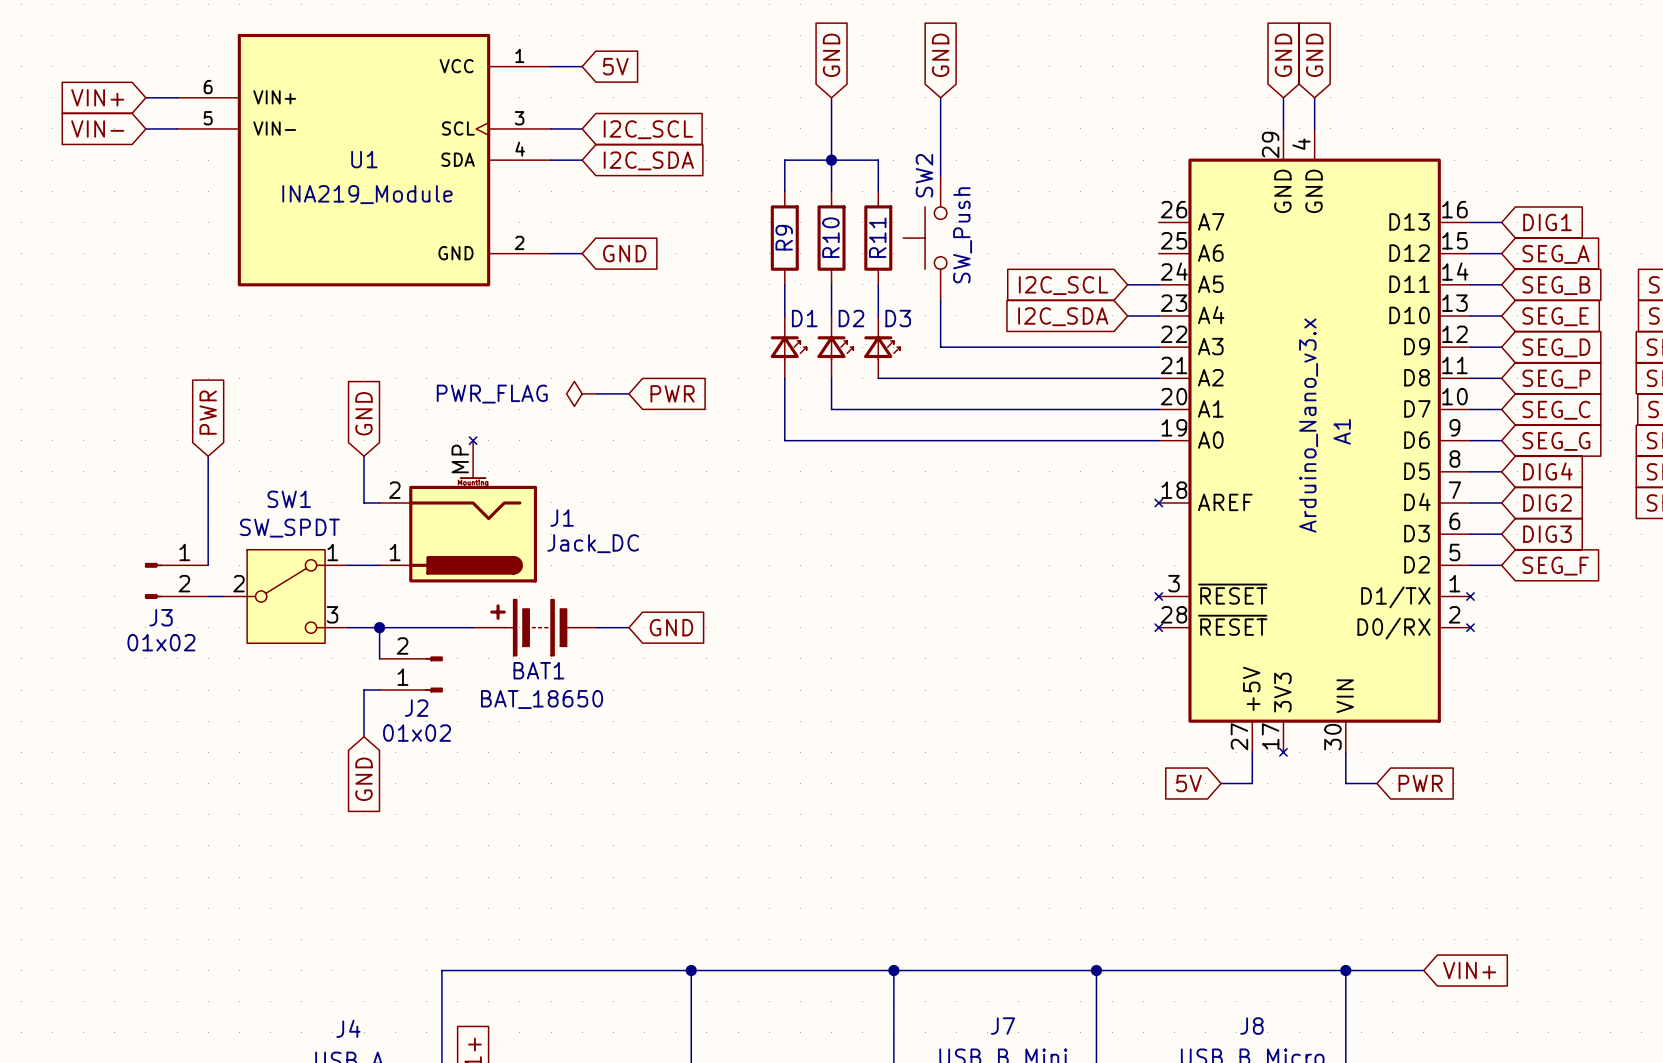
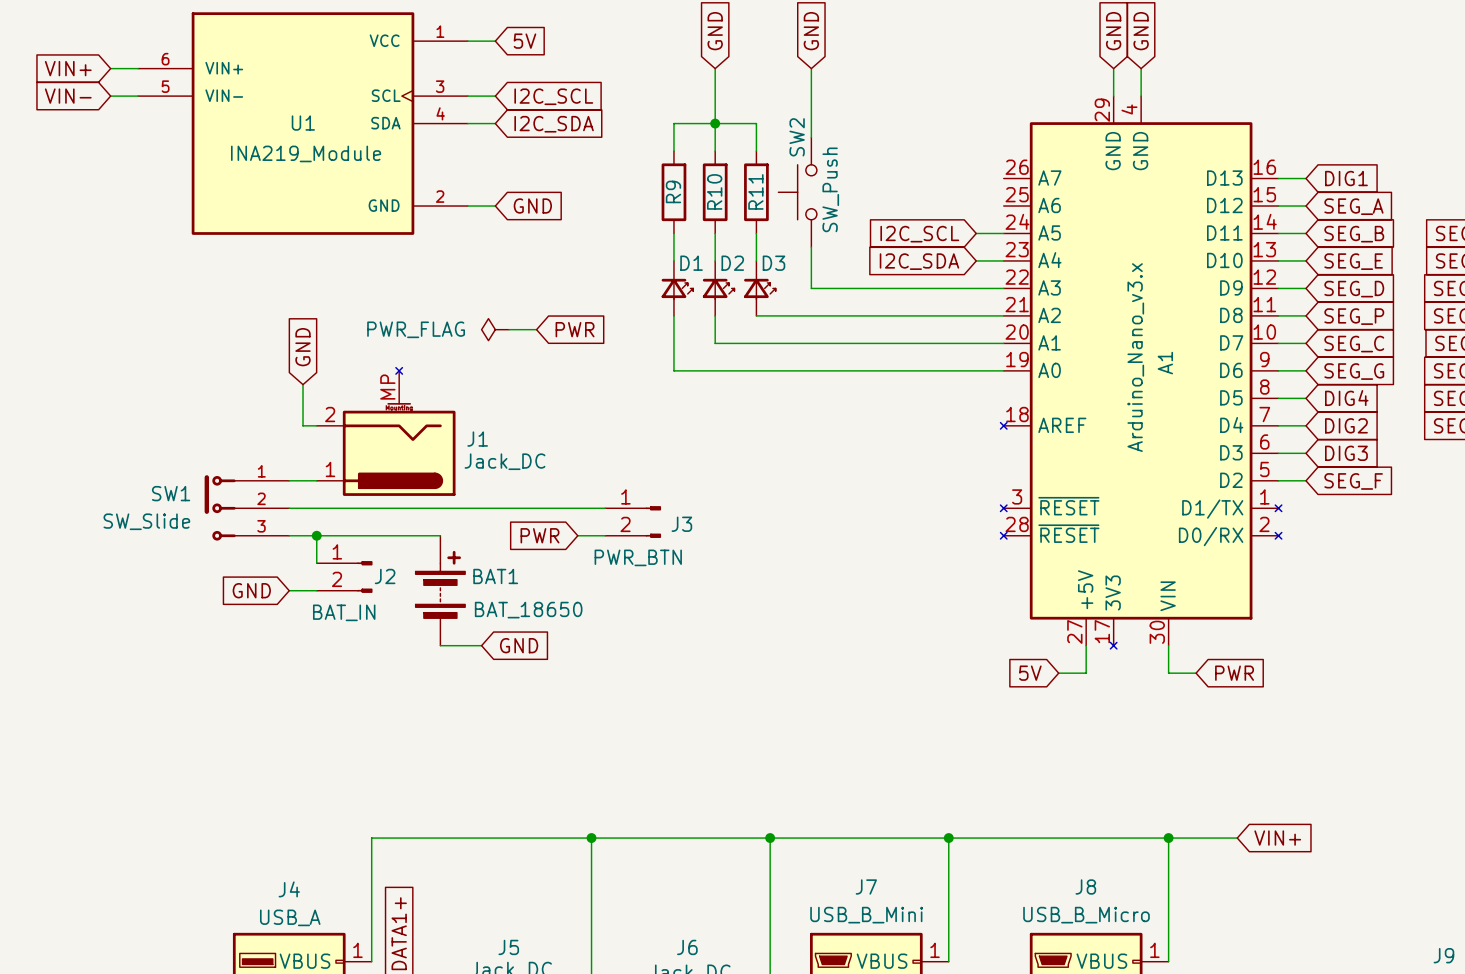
global label: PWR (208, 412) -> none
wire: (208, 456) (208, 565) -> none
SW1 name position: SW1 (289, 499) -> SW1 (171, 493)
SW1 value: SW_SPDT (289, 528) -> SW_Slide (146, 521)
SW1 symbol: [223, 549, 349, 644] -> [204, 475, 290, 541]
J3 flip: as is (153, 580) -> left-right (653, 522)
J3 position: (176, 580) -> (633, 522)
wire: (208, 596) (223, 596) -> none
wire: none -> (289, 508) (605, 508)
J3 name position: J3 (161, 617) -> J3 (681, 524)
BAT1 rotation: 0° (528, 627) -> 90° clockwise (440, 584)
wire: (597, 627) (628, 627) -> (577, 535) (605, 535)
global label: none -> PWR (539, 535)
global label: GND (671, 627) -> none
J3 value: 01x02 (161, 642) -> PWR_BTN (638, 557)
BAT1 name position: BAT1 (538, 670) -> BAT1 (495, 576)
J2 flip: as is (434, 674) -> up-down (364, 576)
wire: (364, 690) (364, 736) -> (303, 590) (289, 590)
BAT1 value position: BAT_18650 (542, 699) -> BAT_18650 (528, 610)
J2 name position: J2 (416, 708) -> J2 (385, 576)
J2 value: 01x02 (416, 733) -> BAT_IN (344, 612)
wire: none -> (440, 645) (481, 645)
global label: none -> GND (519, 645)
global label rotation: 0° (364, 779) -> 90° clockwise (251, 590)
global label position: GND (364, 779) -> GND (251, 590)

